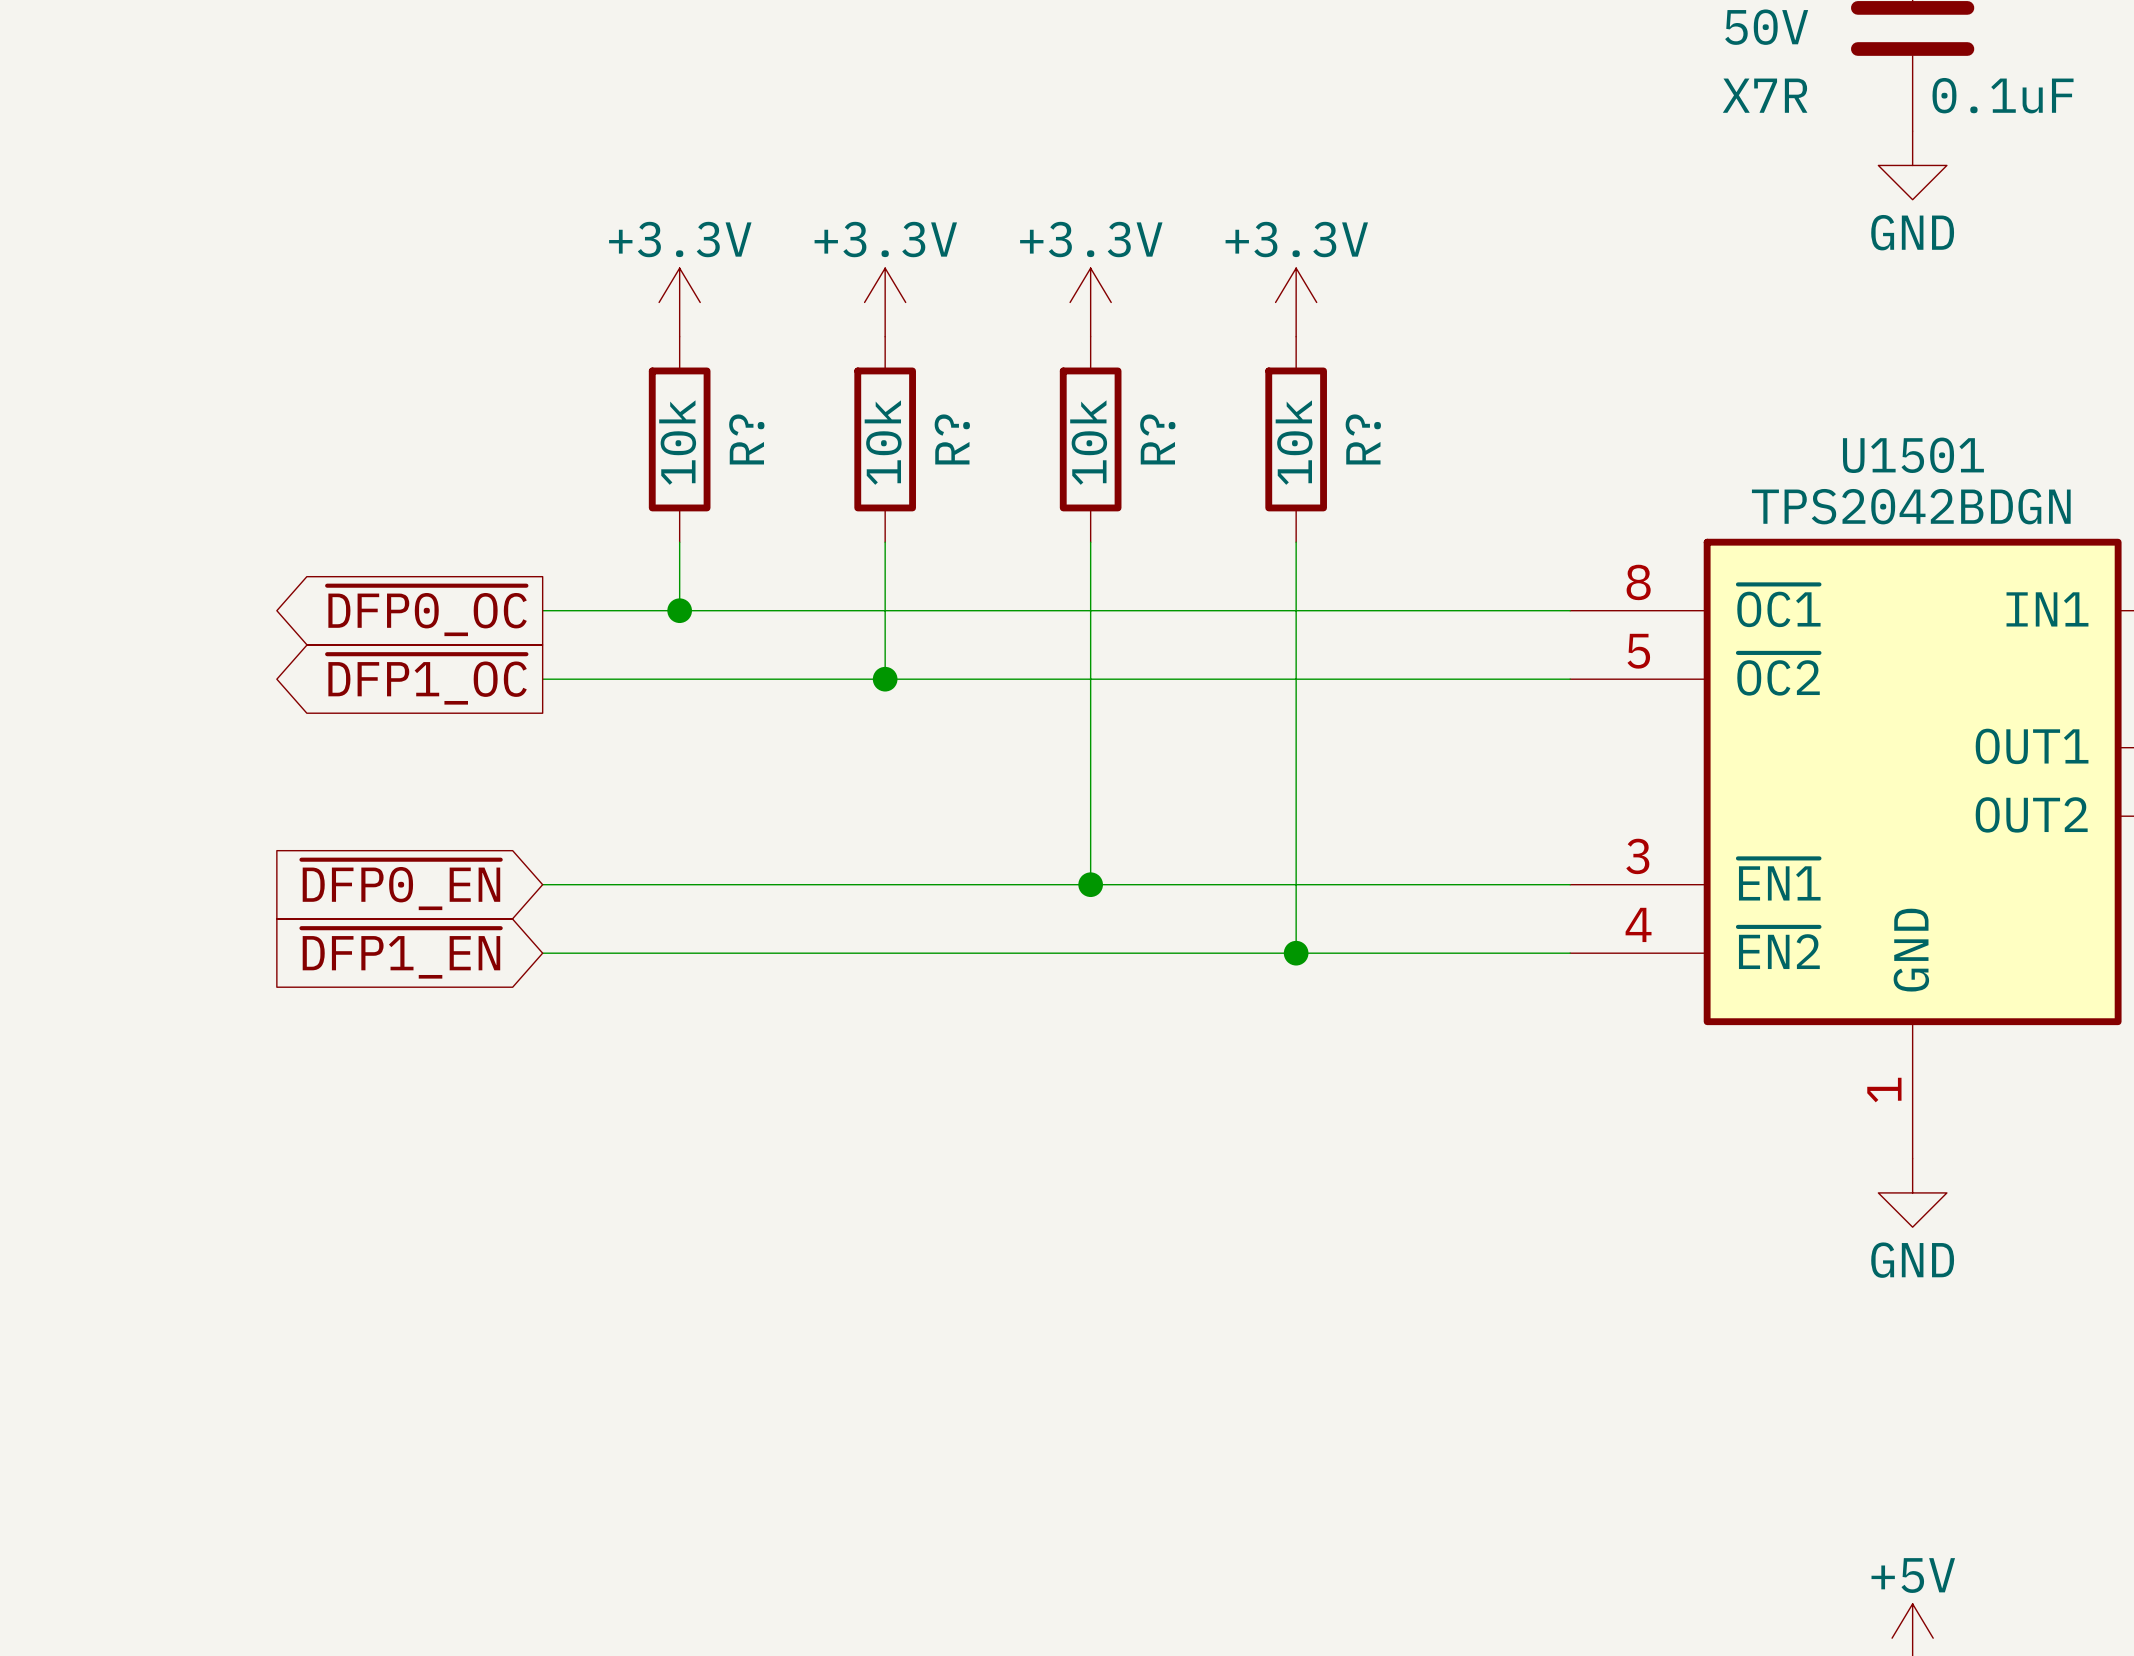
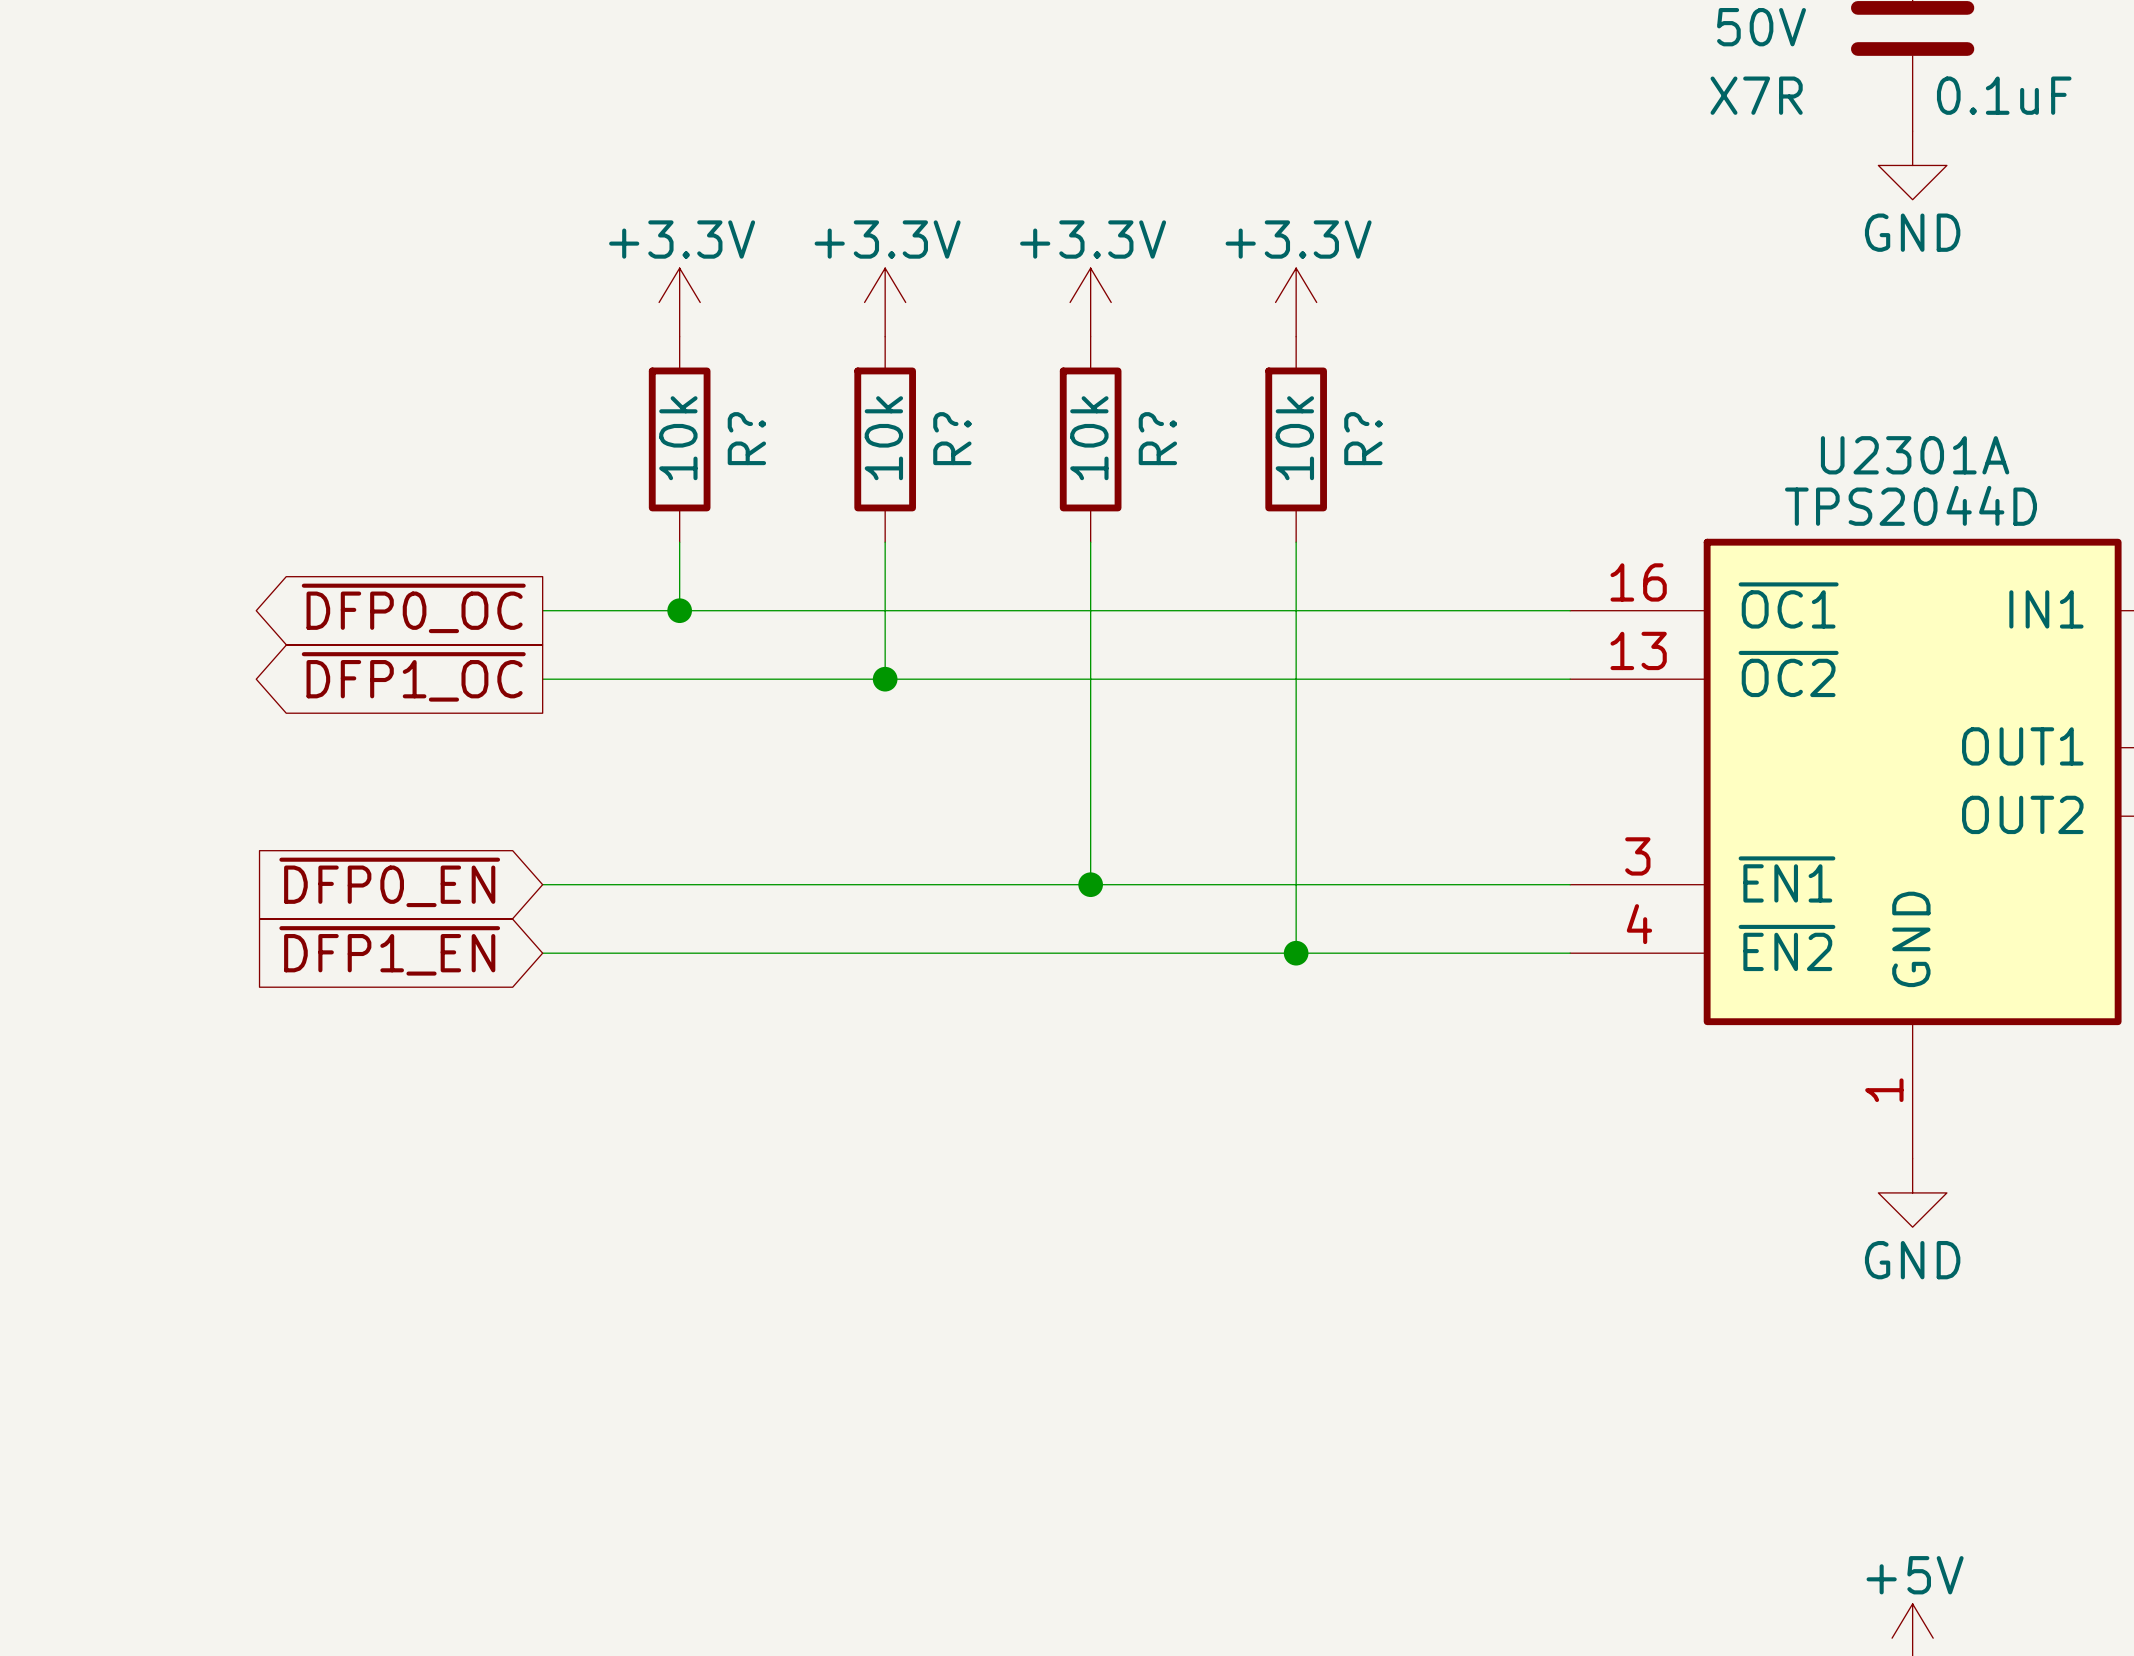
U1501 name: U1501 (1913, 455) -> U2301A (1915, 455)
U1501 value: TPS2042BDGN (1911, 506) -> TPS2044D (1911, 505)
U1501 pin number: 8 (1638, 582) -> 16 (1638, 582)
U1501 pin number: 5 (1638, 651) -> 13 (1638, 650)

